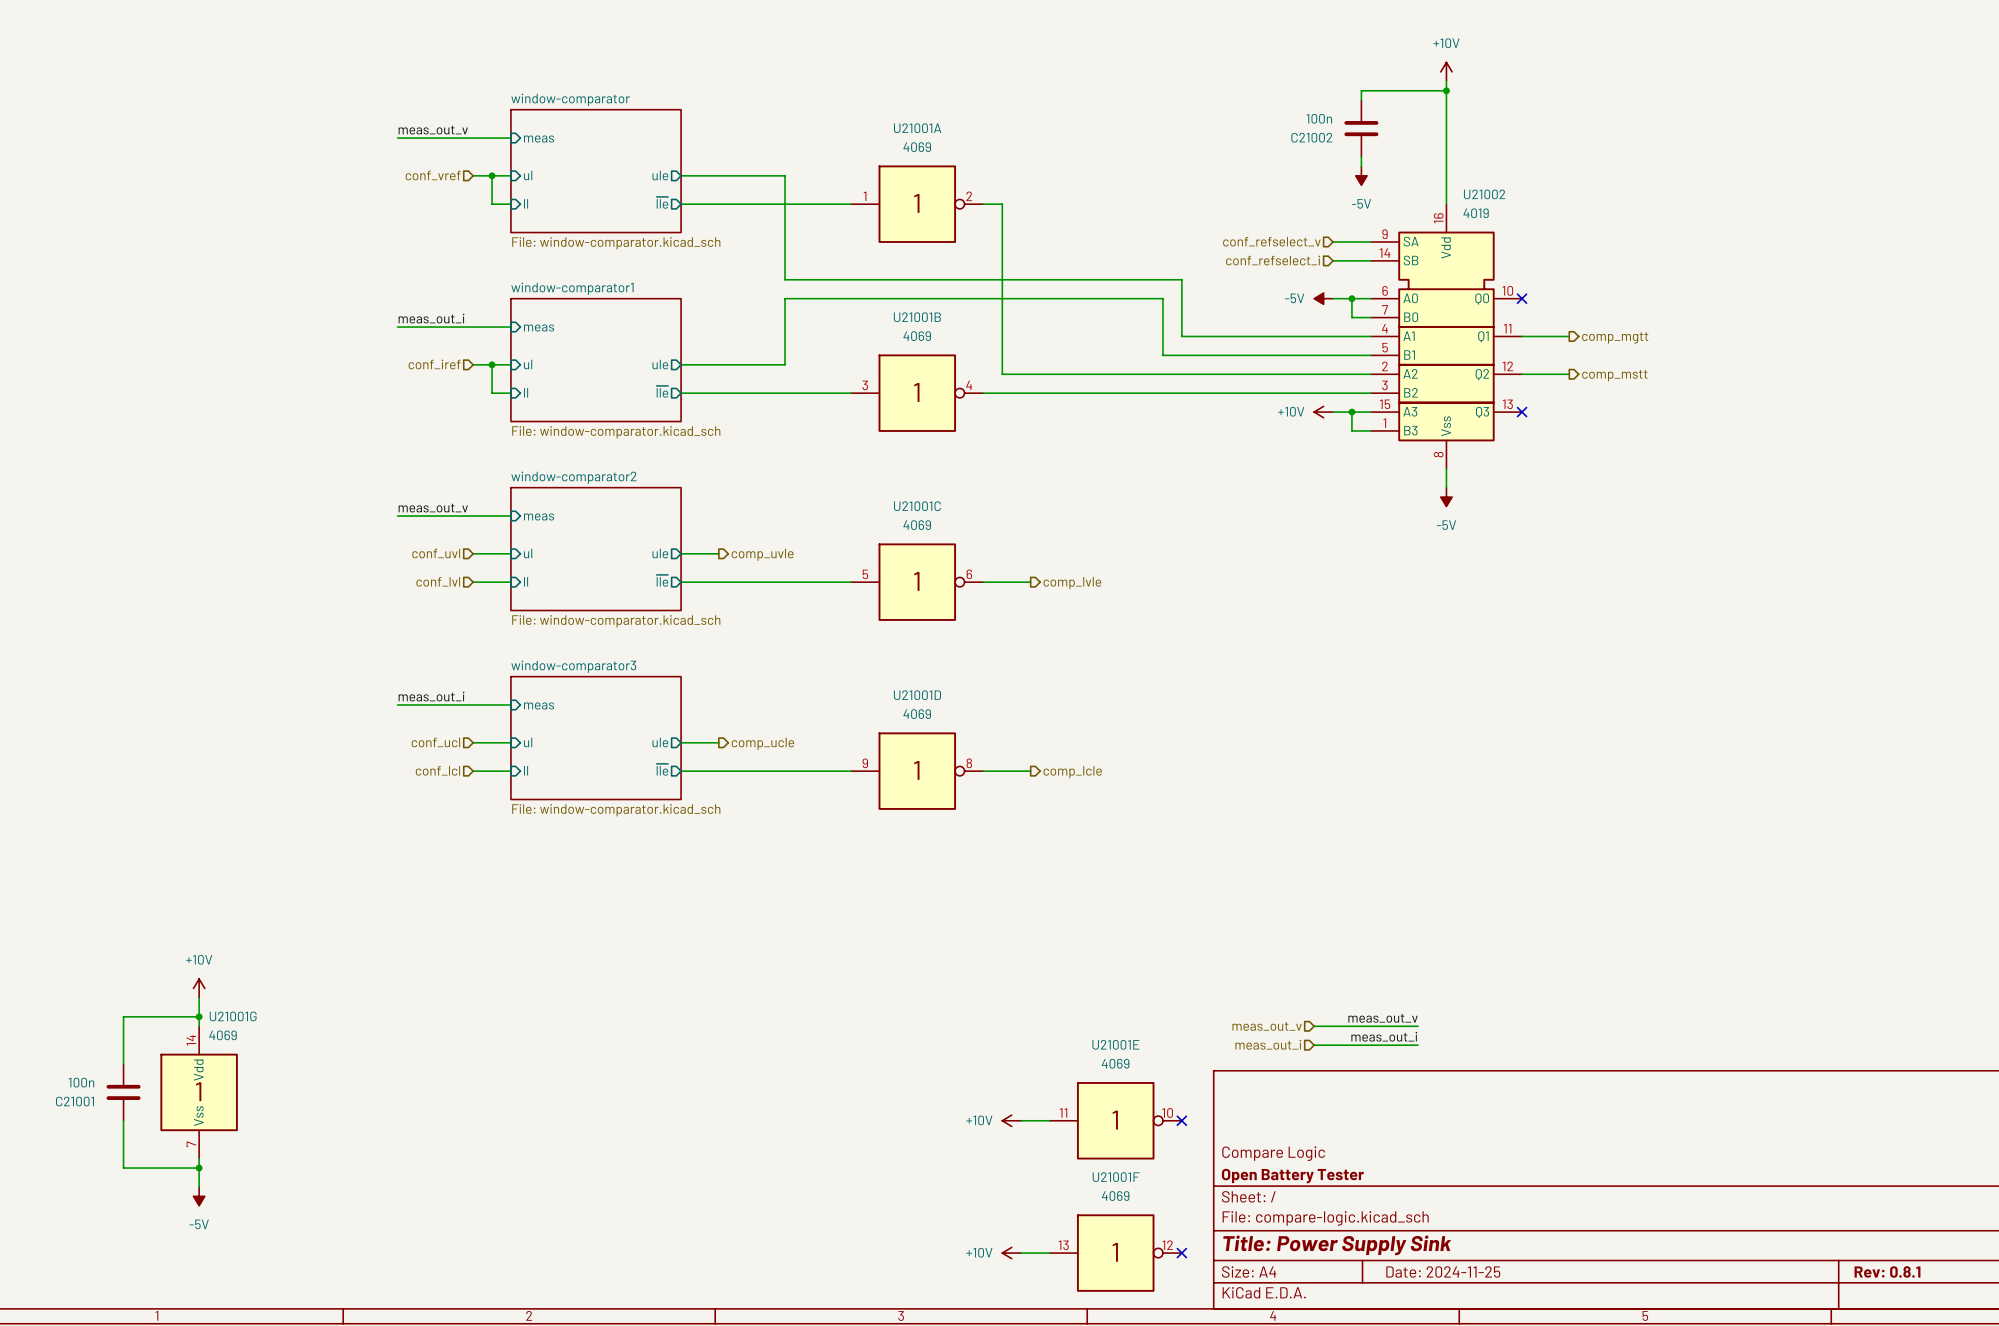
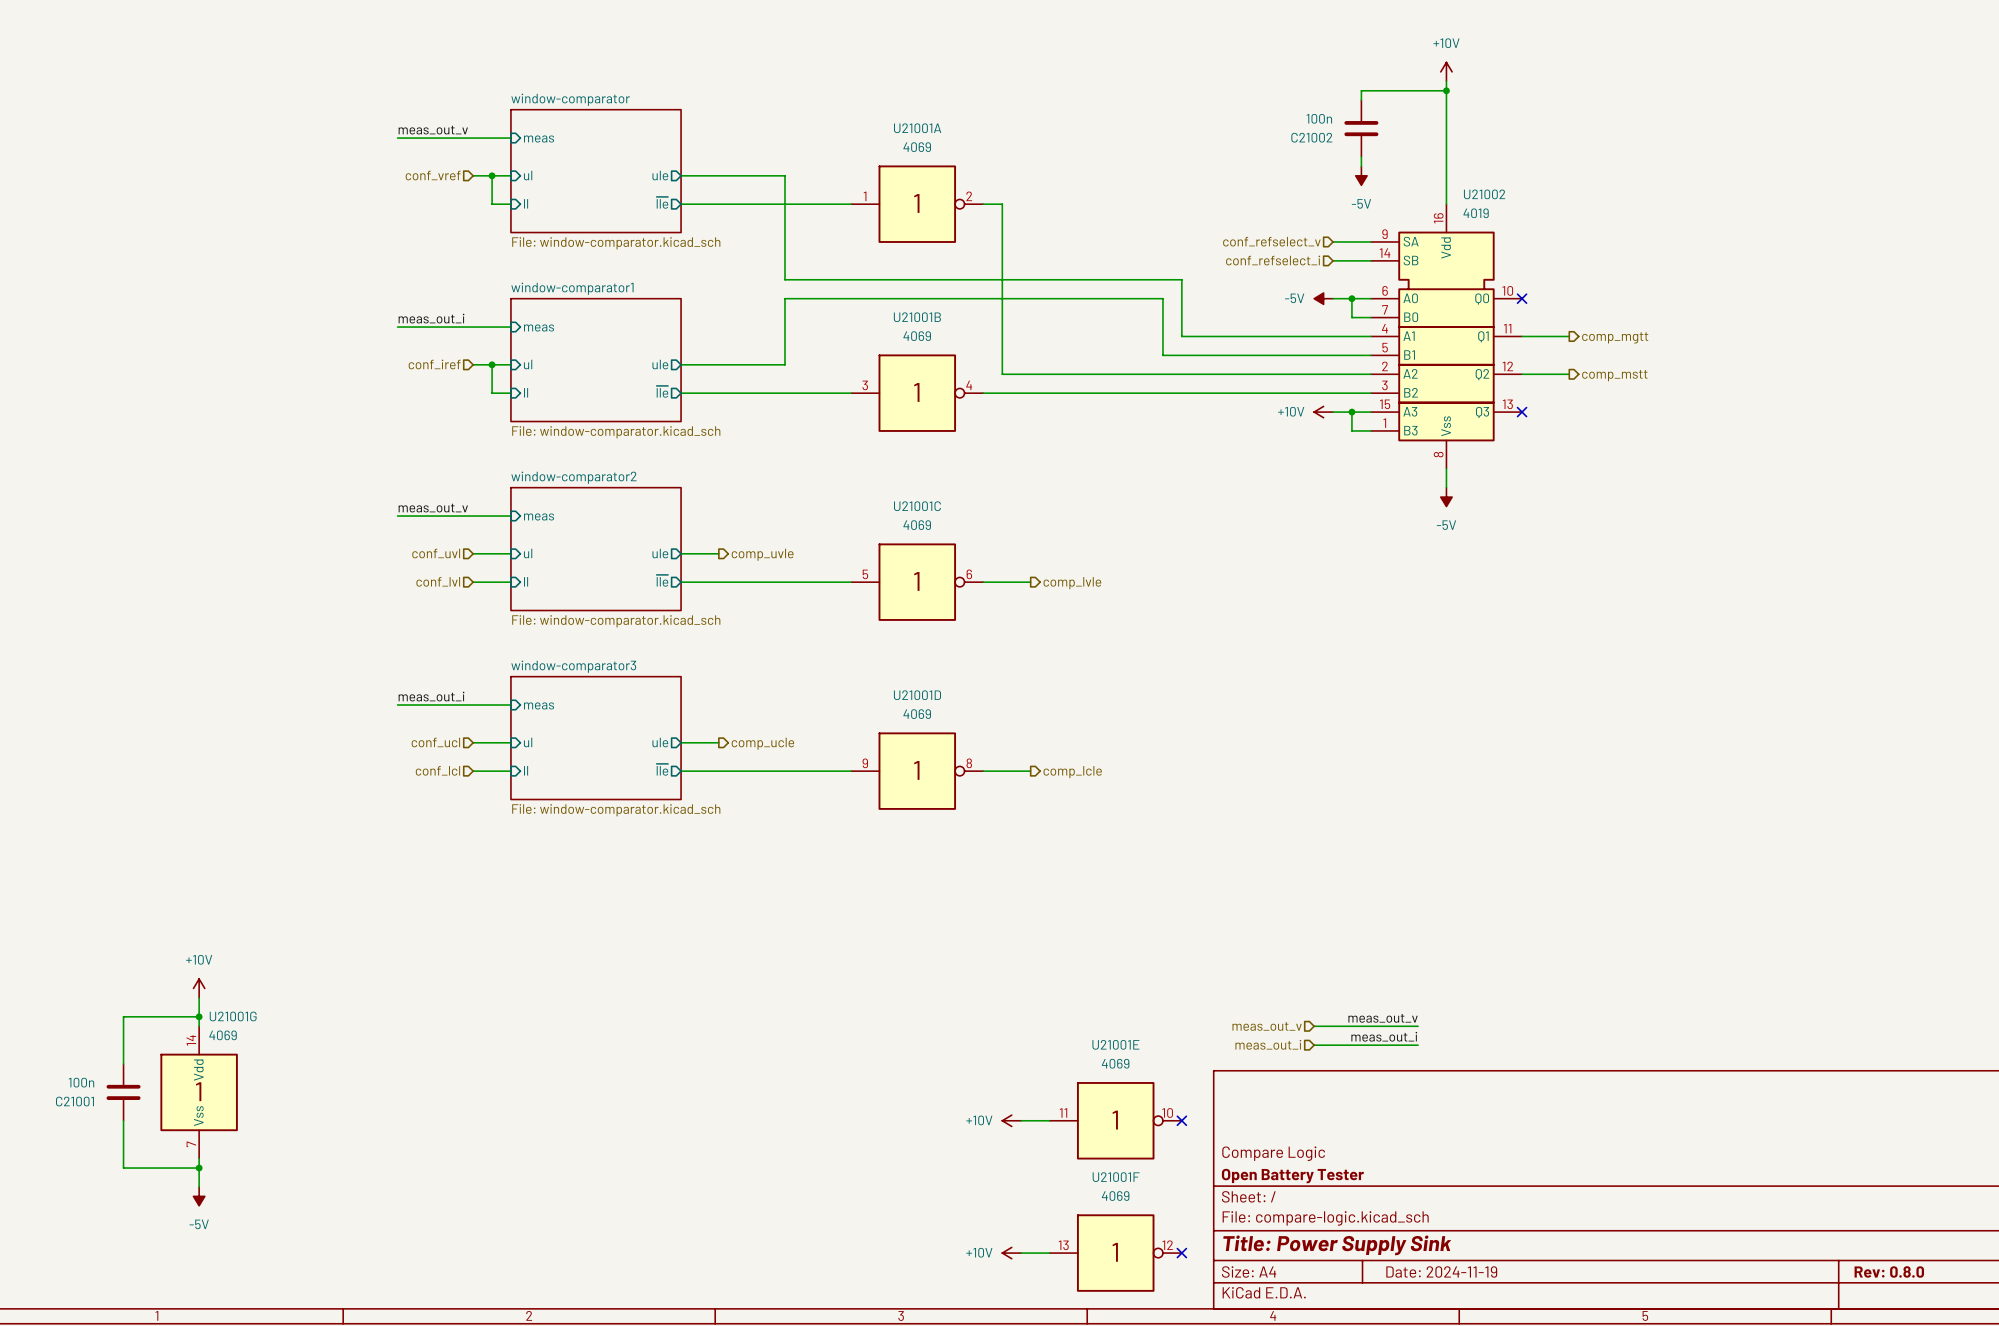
title block: Rev: 0.8.1 (1887, 1271) -> Rev: 0.8.0 (1889, 1271)
title block: Date: 2024-11-25 (1443, 1272) -> Date: 2024-11-19 (1441, 1272)

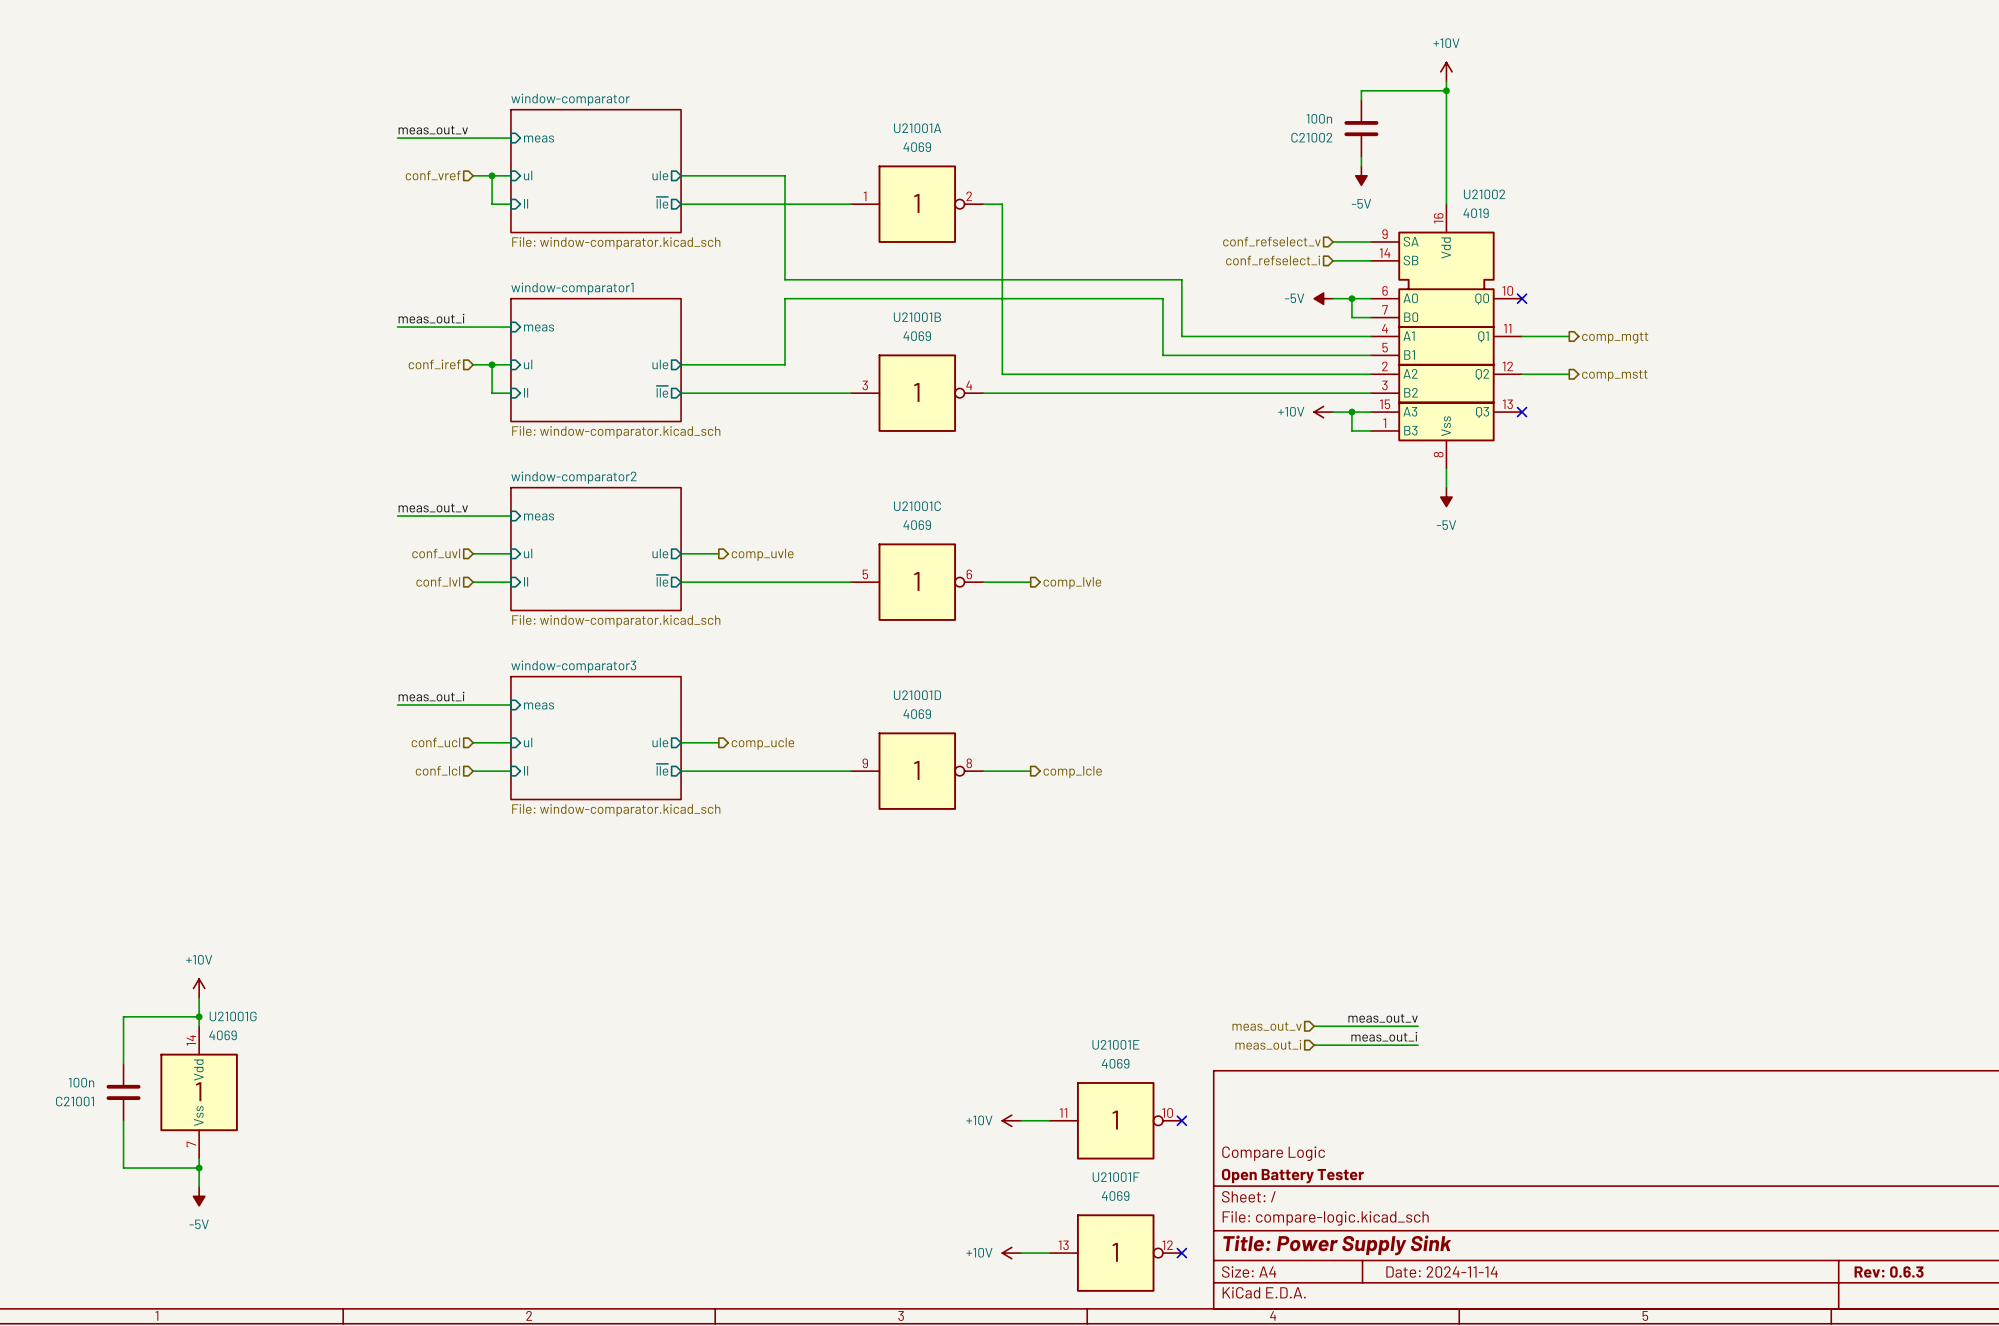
title block: Rev: 0.8.0 (1889, 1271) -> Rev: 0.6.3 (1889, 1272)
title block: Date: 2024-11-19 (1441, 1272) -> Date: 2024-11-14 (1442, 1272)

